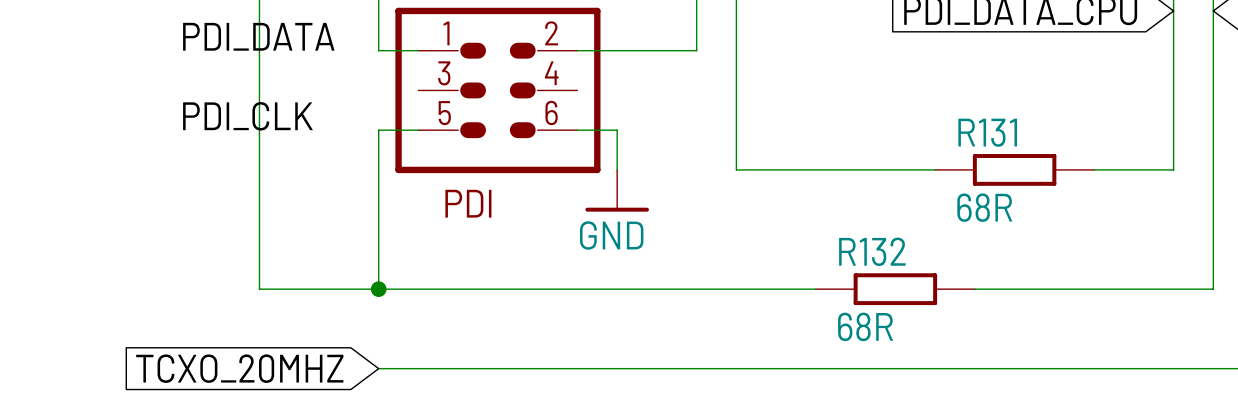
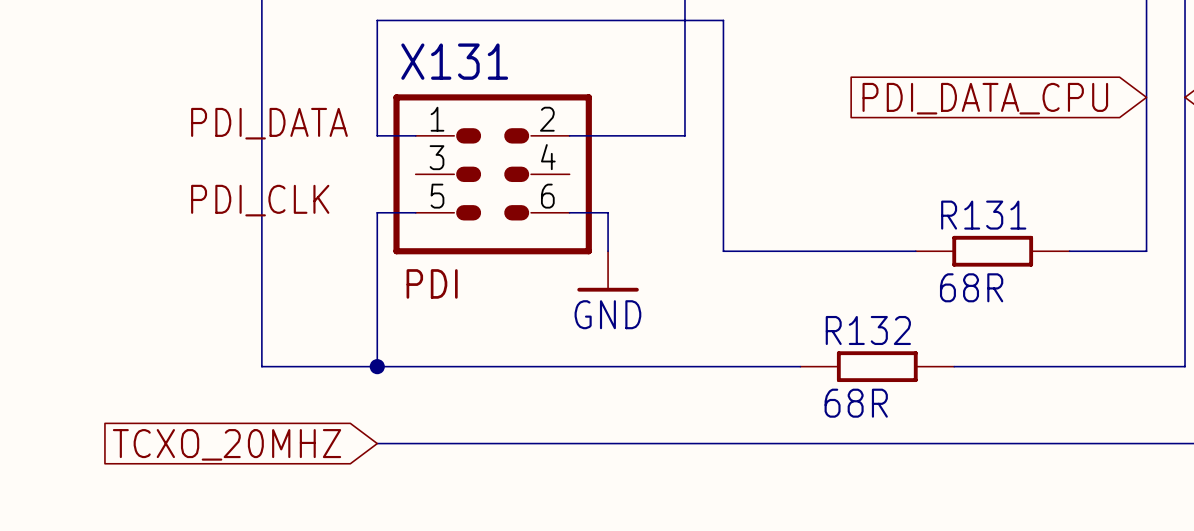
text position: PDI (468, 203) -> PDI (432, 283)

